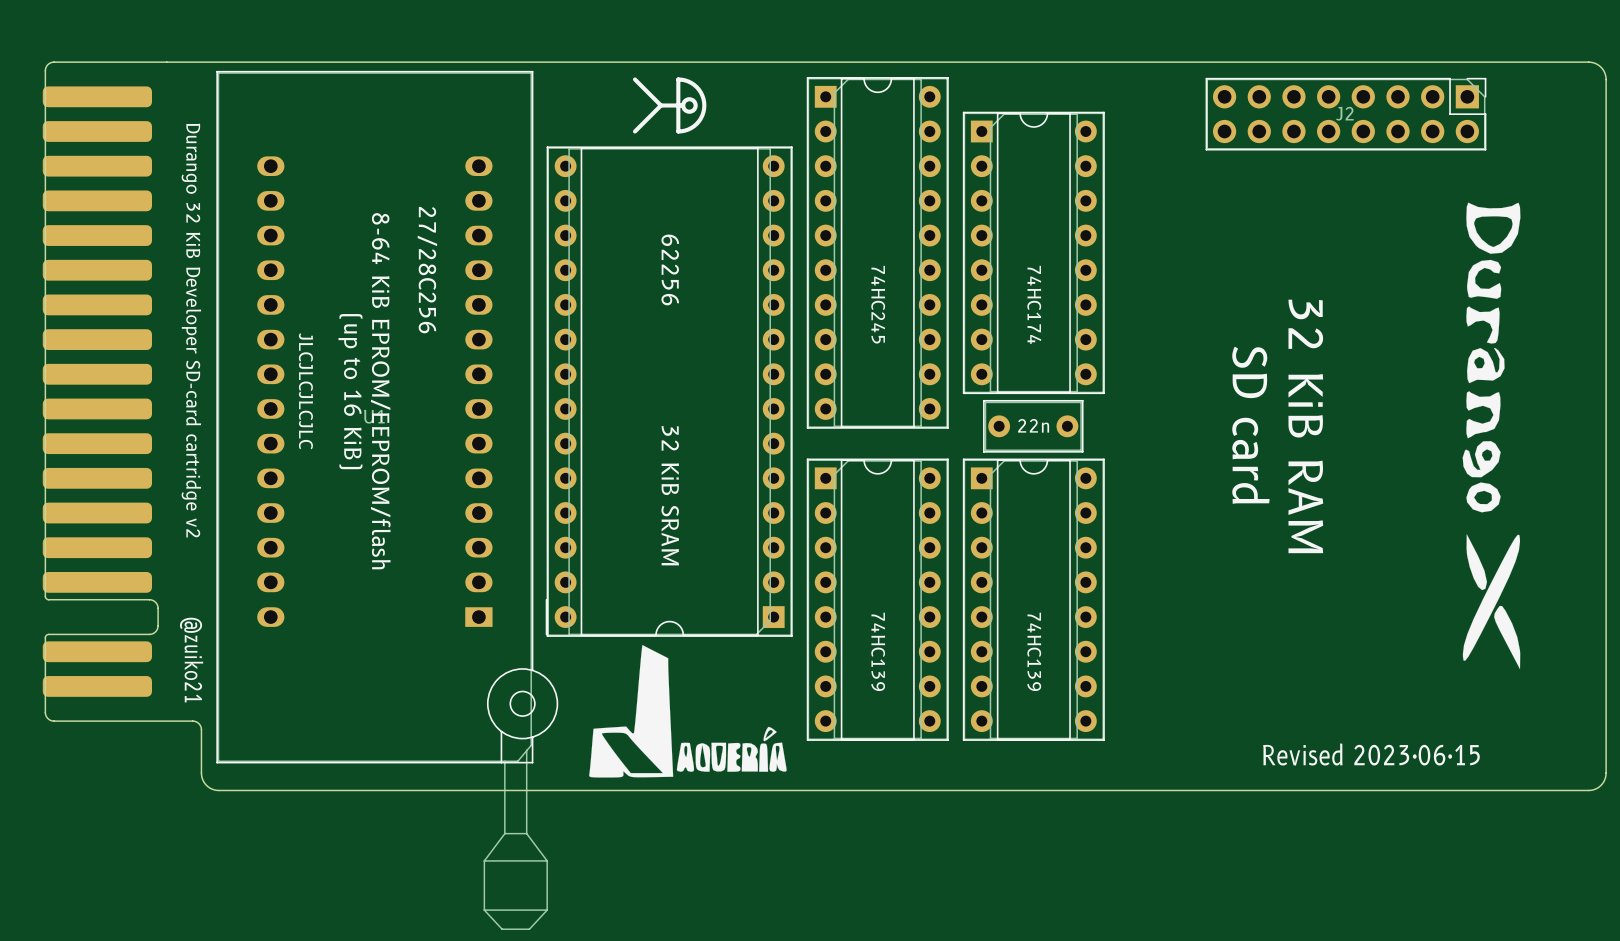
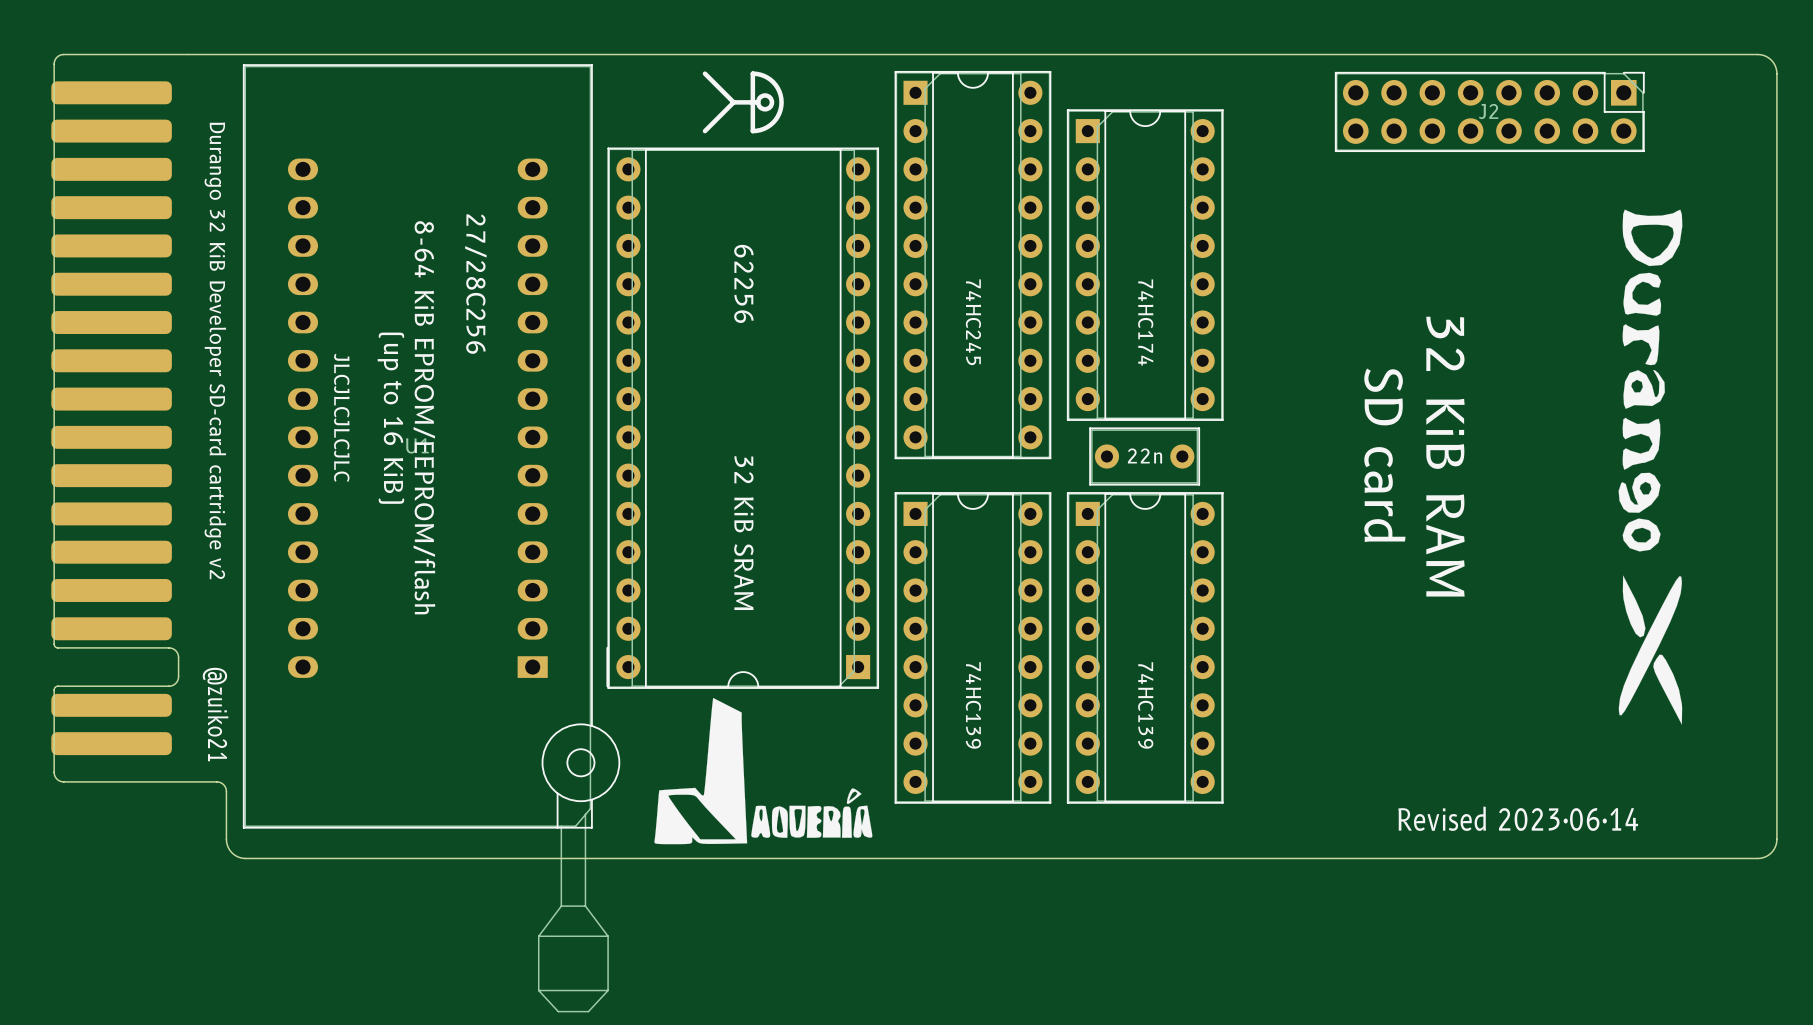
text: Revised 2023·06·15 (1371, 754) -> Revised 2023·06·14 (1518, 818)

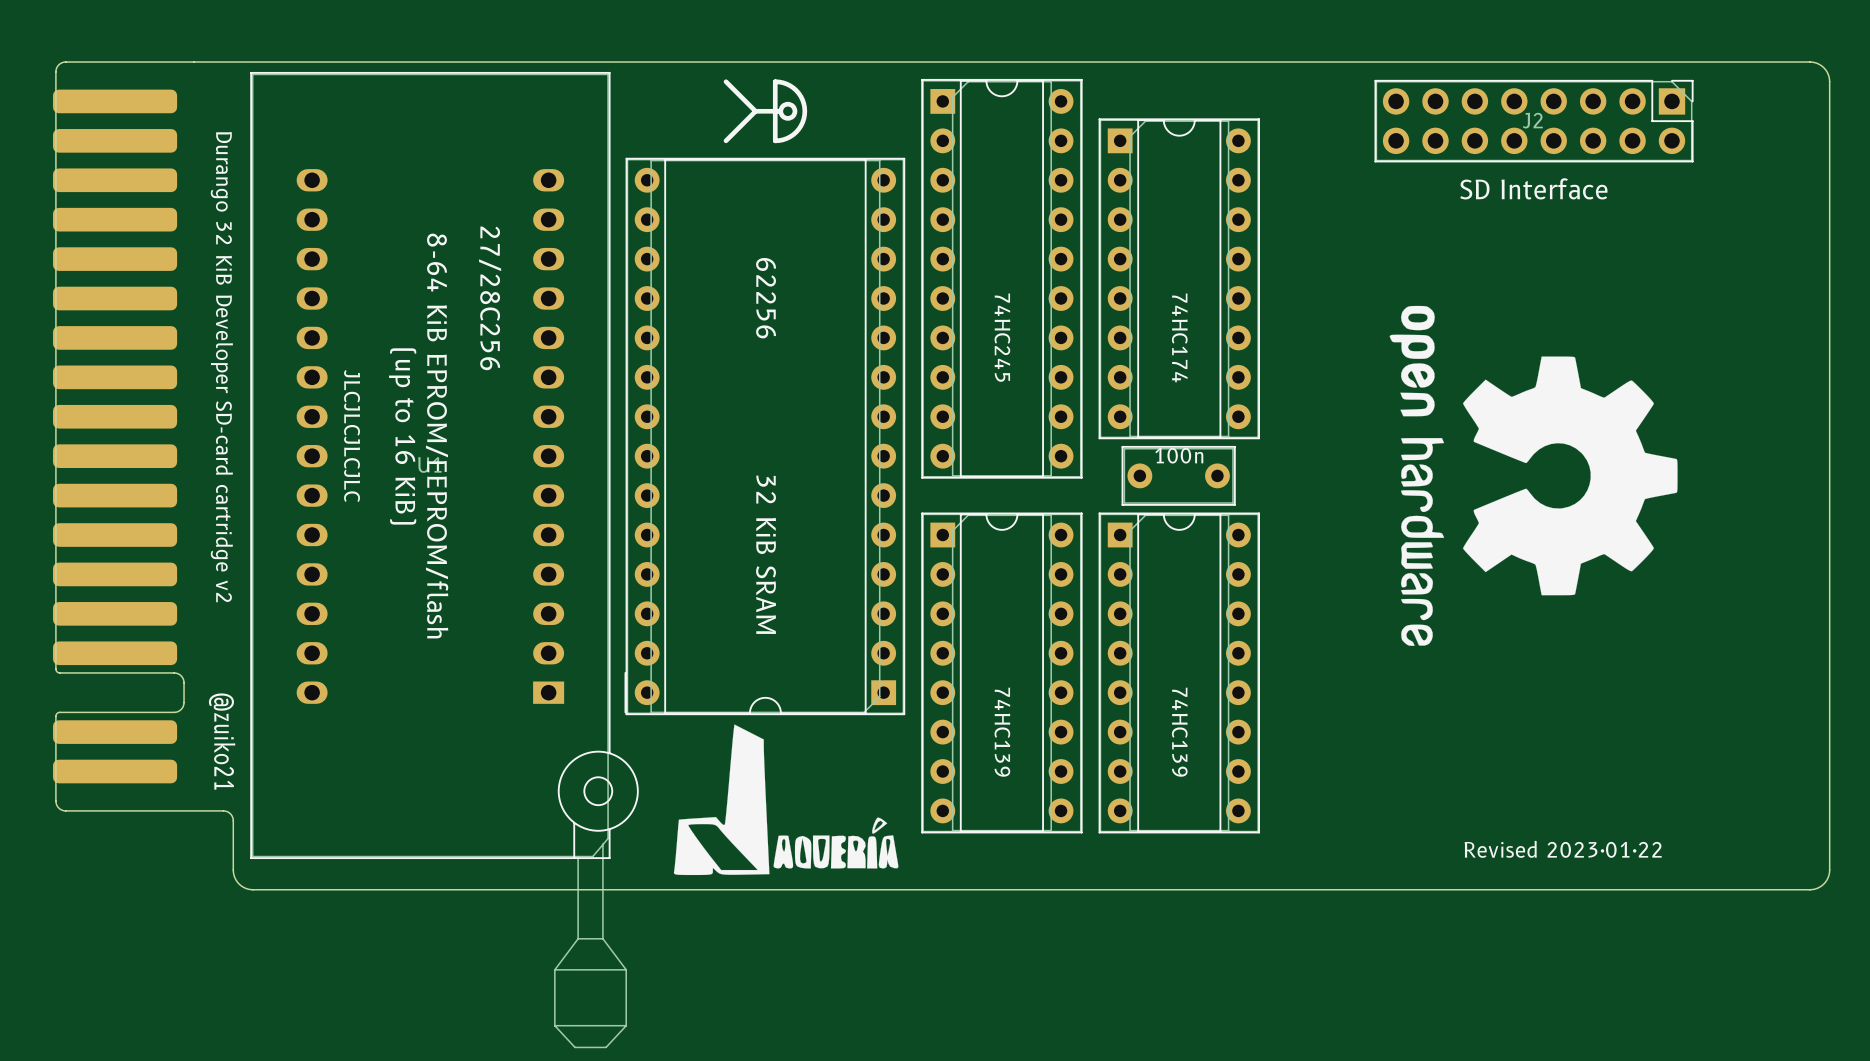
J2 value: none -> SD Interface (1533, 188)
drawing: [1618, 209, 1683, 725] -> none
drawing: none -> [1389, 305, 1678, 646]
part value: 22n (1145, 455) -> 100n (1179, 455)
text: SD card (1384, 455) -> none
text: 32 KiB RAM (1445, 456) -> none
text: Revised 2023·06·14 (1518, 818) -> Revised 2023·01·22 (1563, 849)

